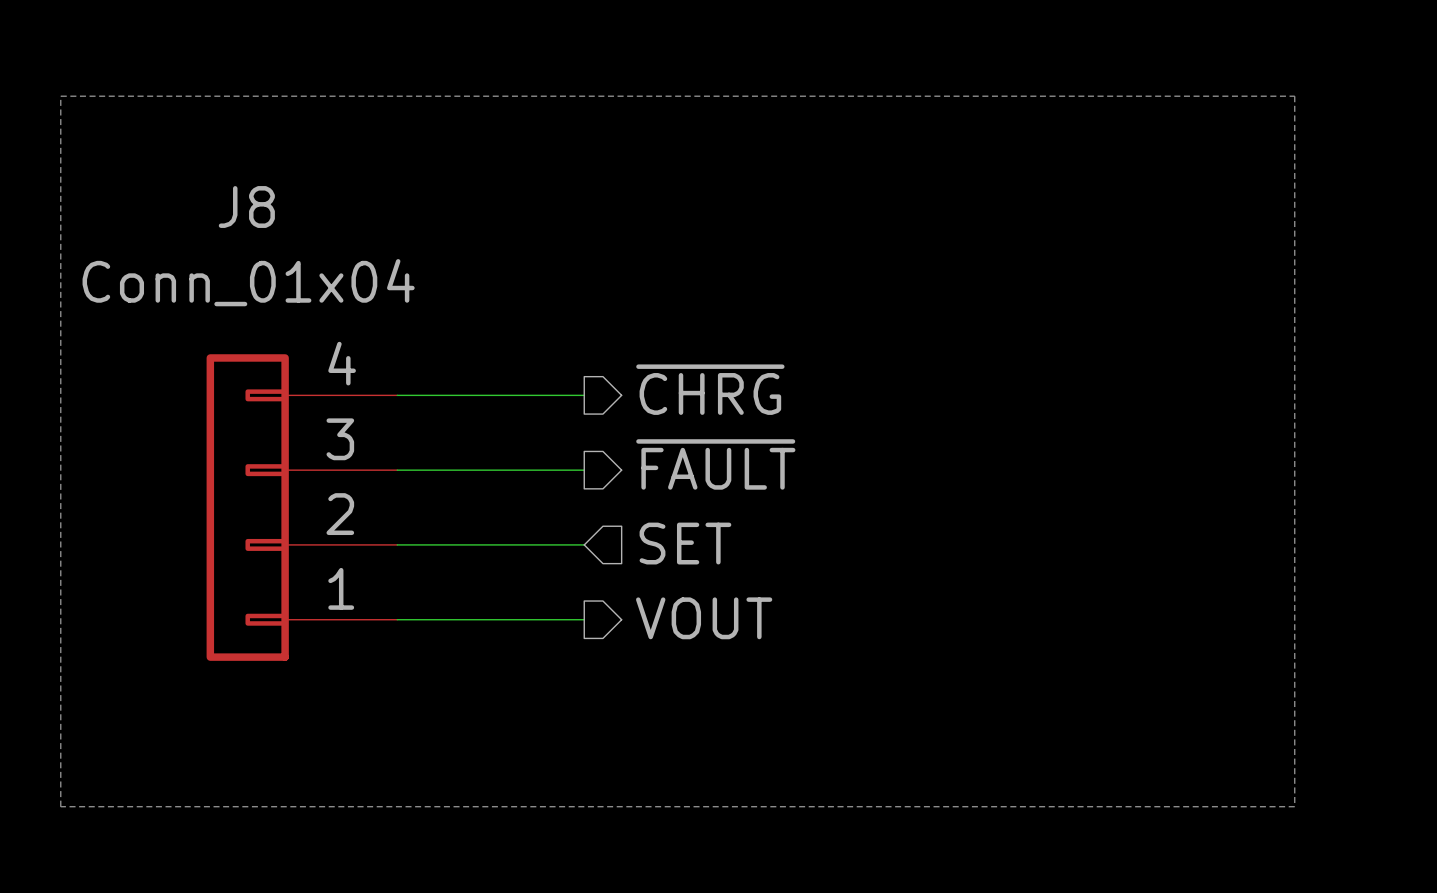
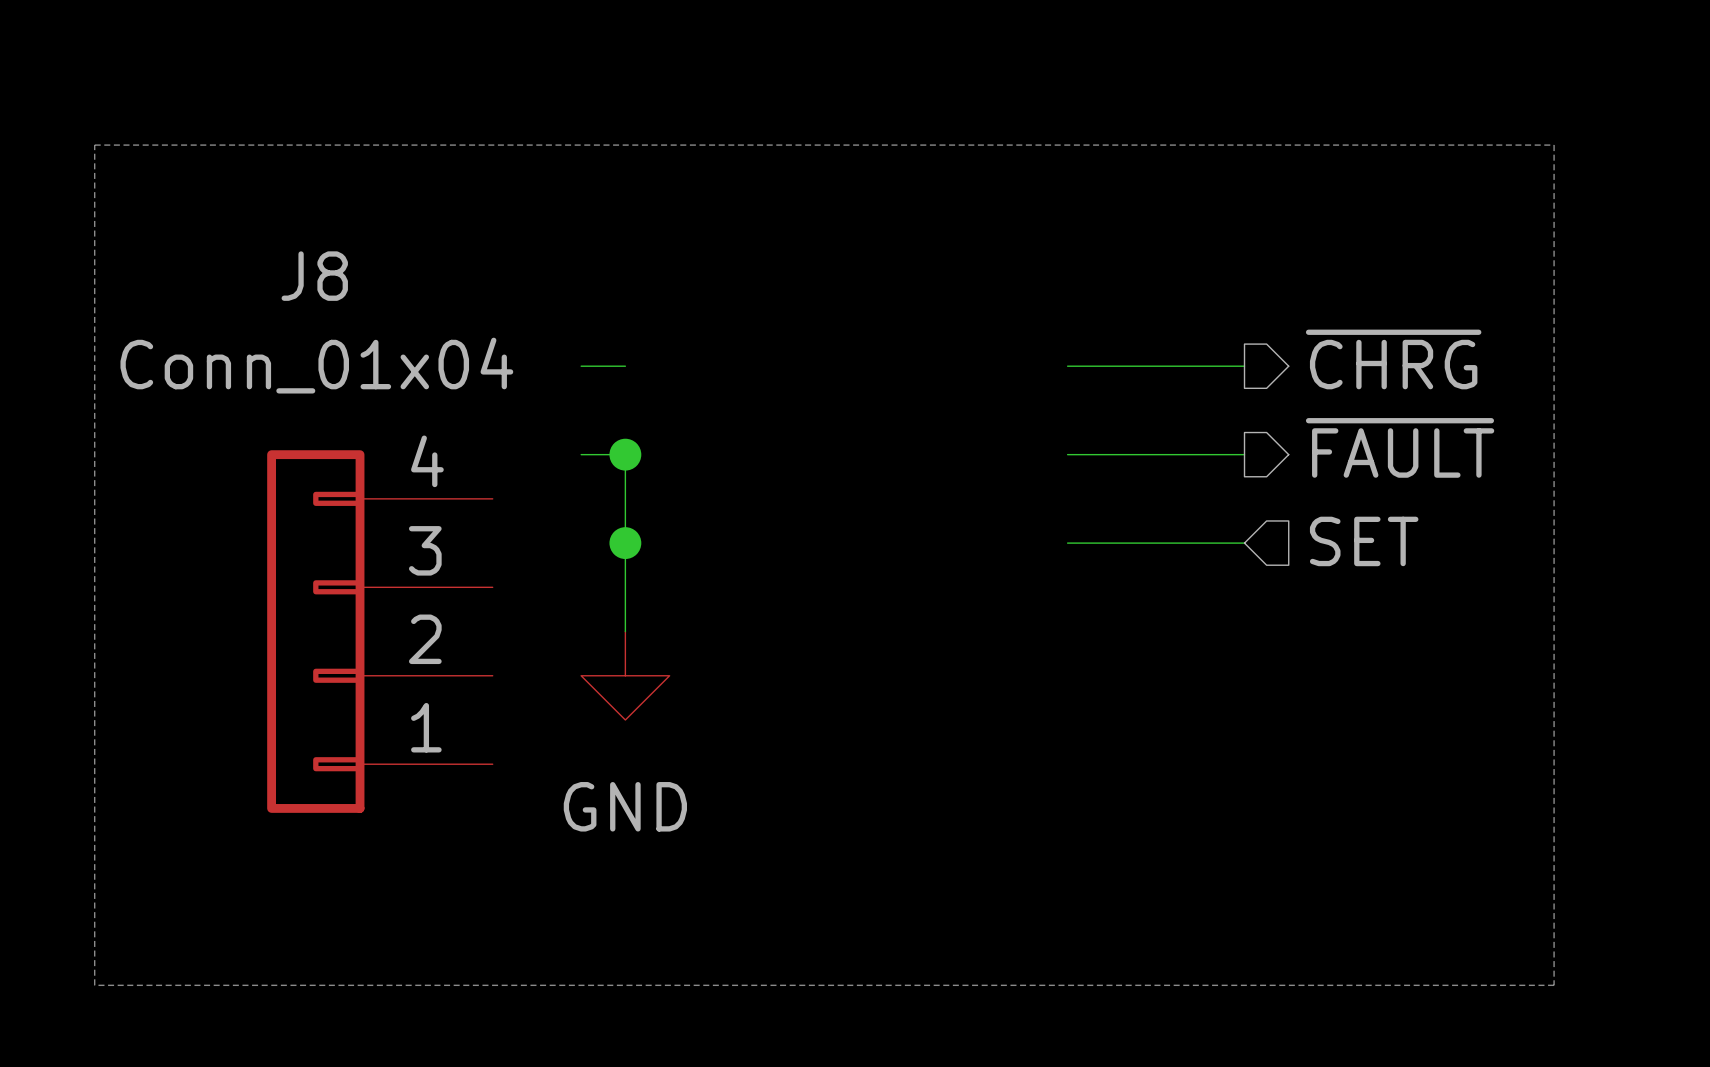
wire: none -> (581, 366) (625, 366)
wire: none -> (1067, 366) (1244, 366)
wire: none -> (581, 454) (625, 454) (625, 631)
junction: none -> (625, 454)
wire: none -> (1067, 454) (1244, 454)
hierarchical label position: ~{CHRG} (710, 389) -> ~{CHRG} (1393, 359)
wire: (397, 395) (584, 395) -> none
junction: none -> (625, 543)
wire: none -> (1067, 543) (1244, 543)
hierarchical label position: ~{FAULT} (715, 464) -> ~{FAULT} (1400, 447)
wire: (397, 470) (584, 470) -> none
hierarchical label position: SET (685, 543) -> SET (1364, 541)
wire: (397, 544) (584, 544) -> none
power symbol: none -> GND (625, 675)
hierarchical label: VOUT (704, 618) -> none
wire: (397, 619) (584, 619) -> none

